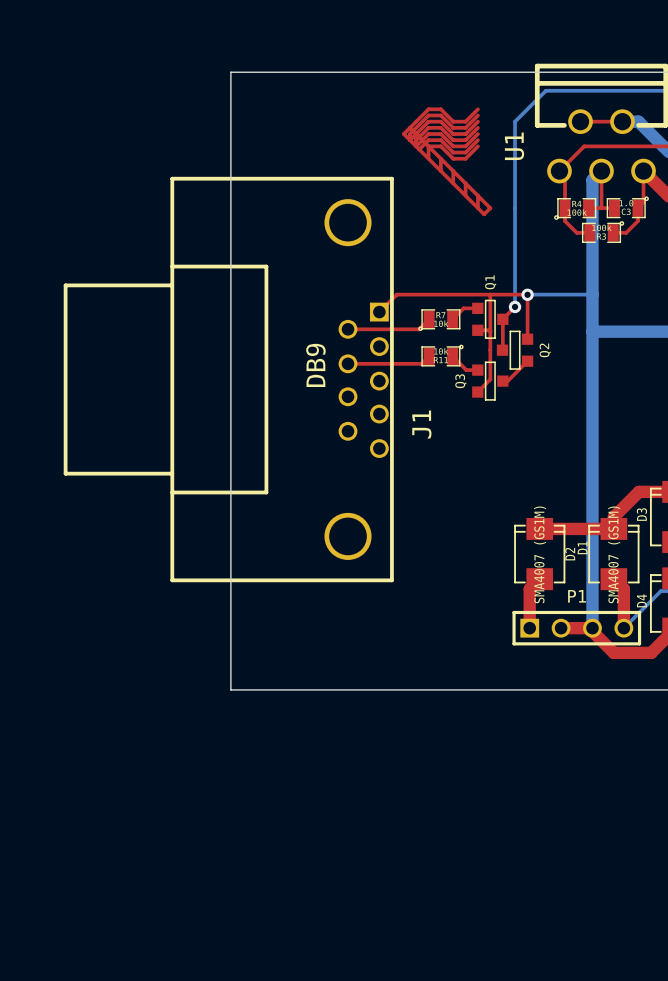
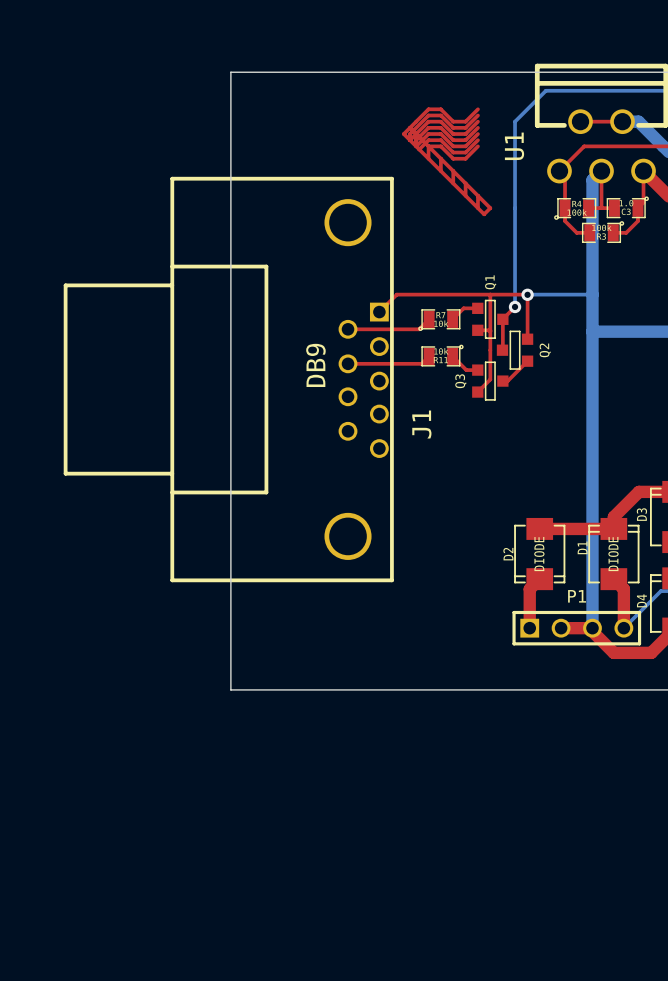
D2 rotation: 0° (539, 554) -> 180° (539, 554)
D2 value: SMA4007 (GS1M) (540, 554) -> DIODE (539, 554)
D1 value: SMA4007 (GS1M) (614, 554) -> DIODE (613, 554)

